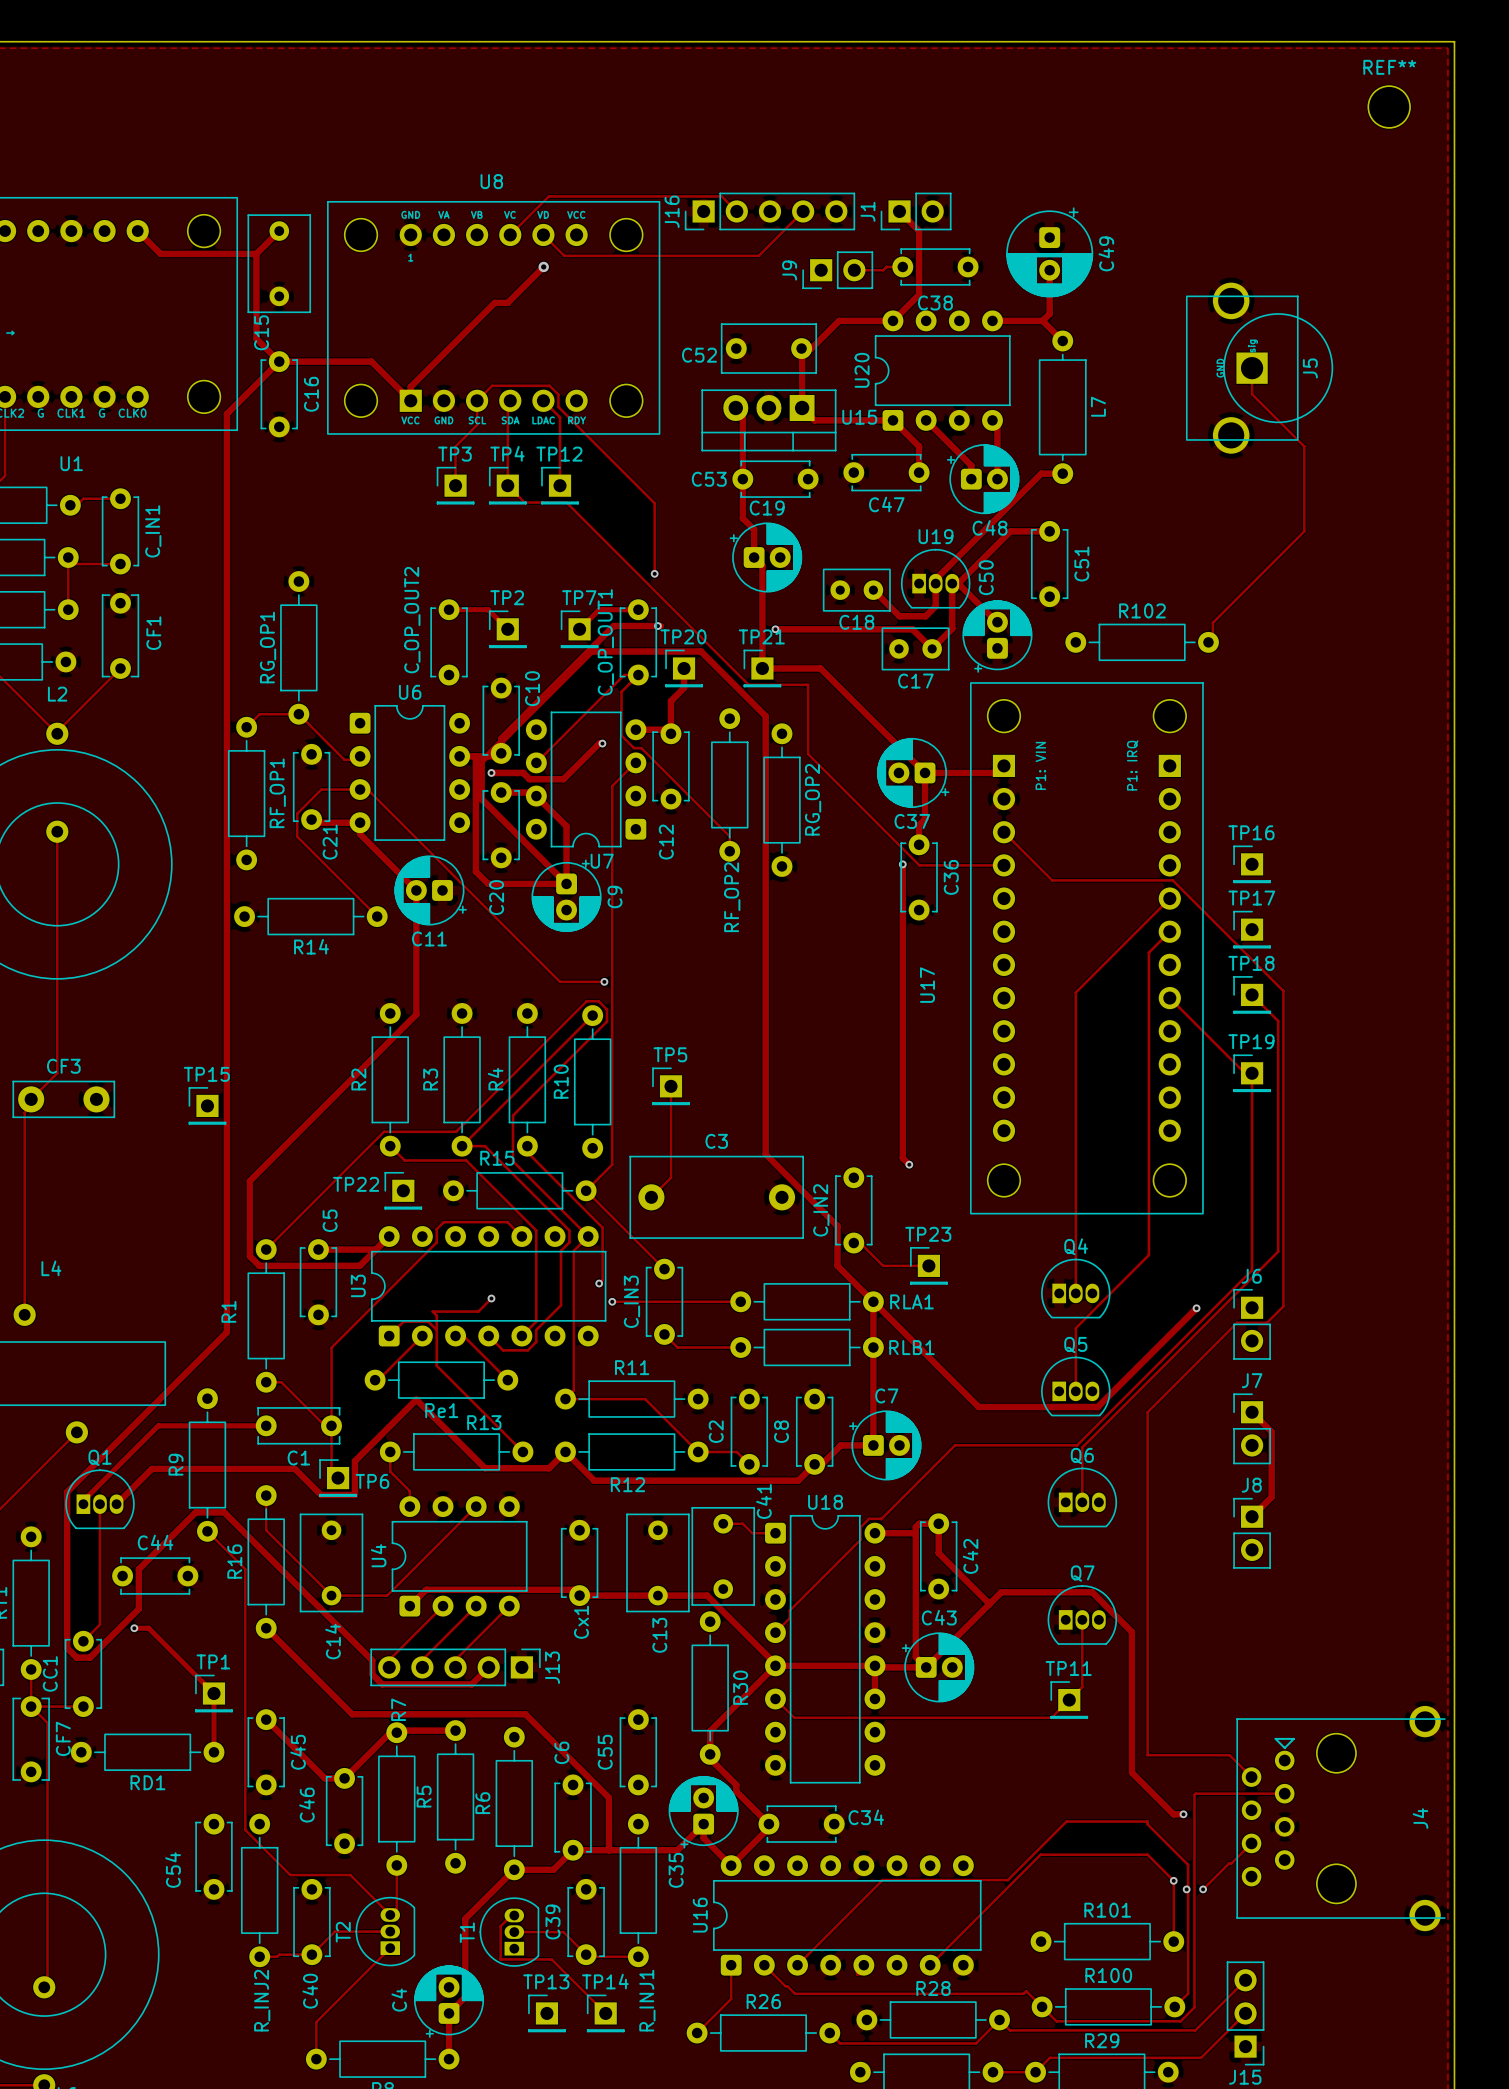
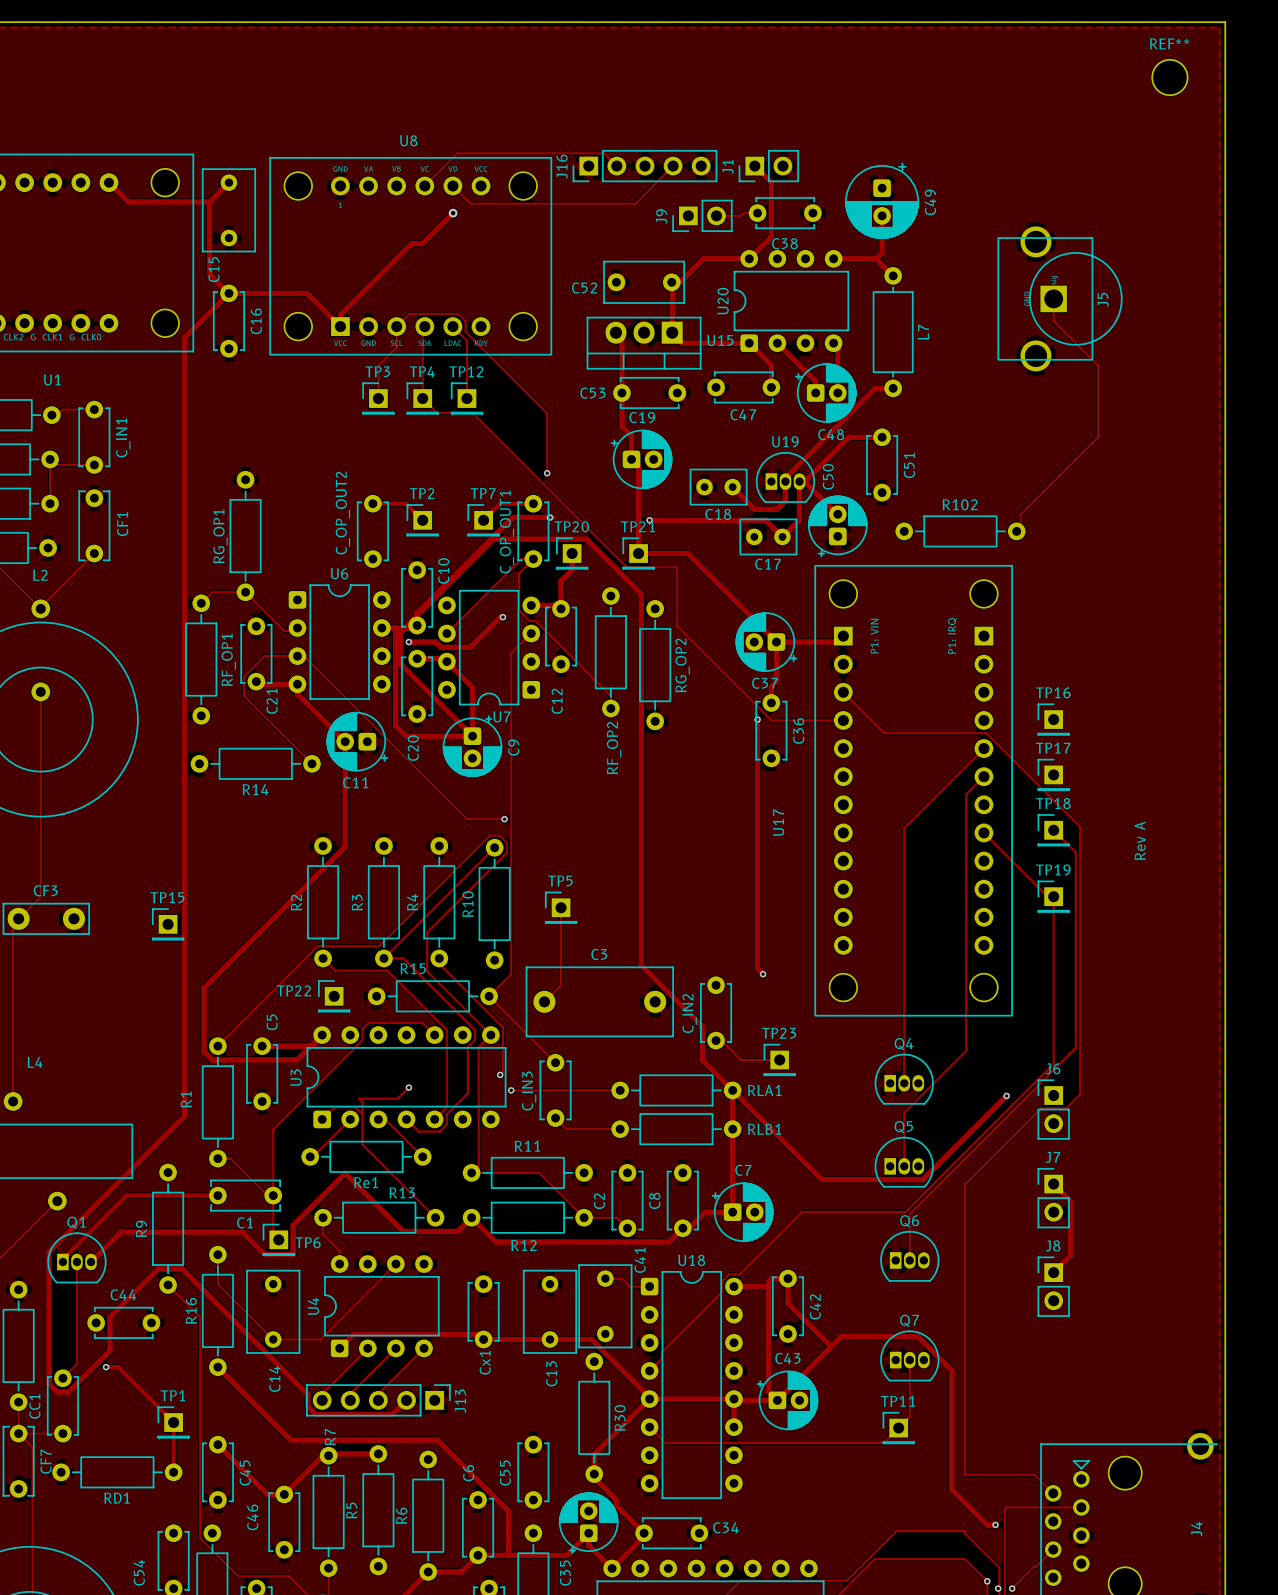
text: none -> Rev A (1140, 840)

